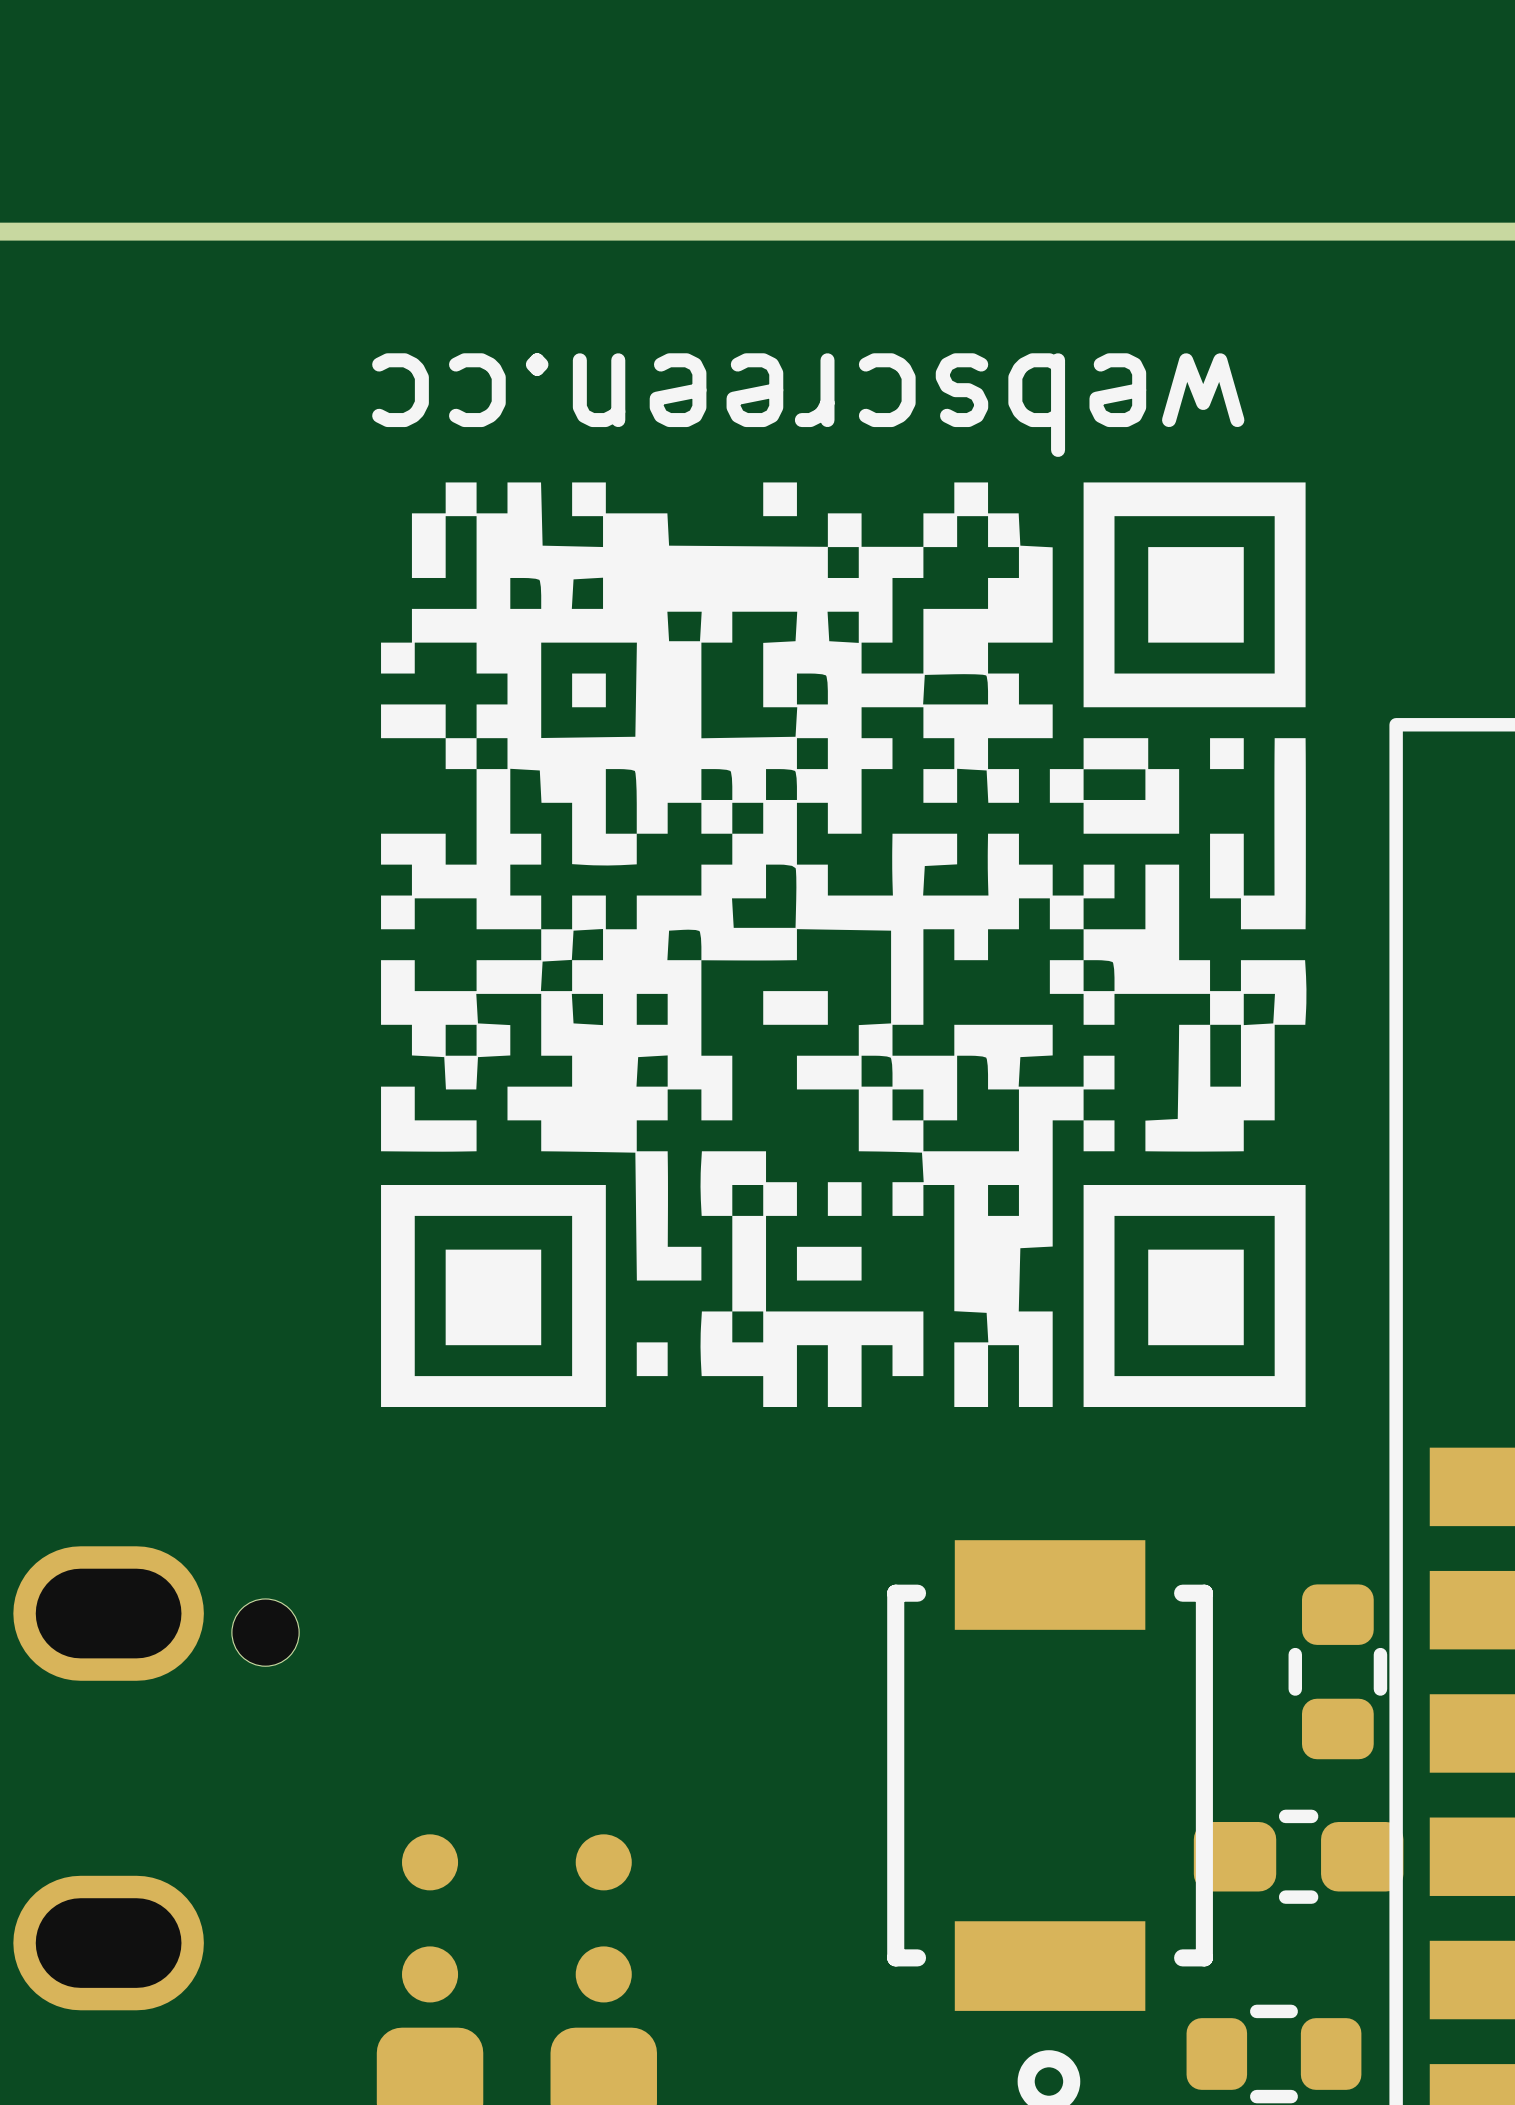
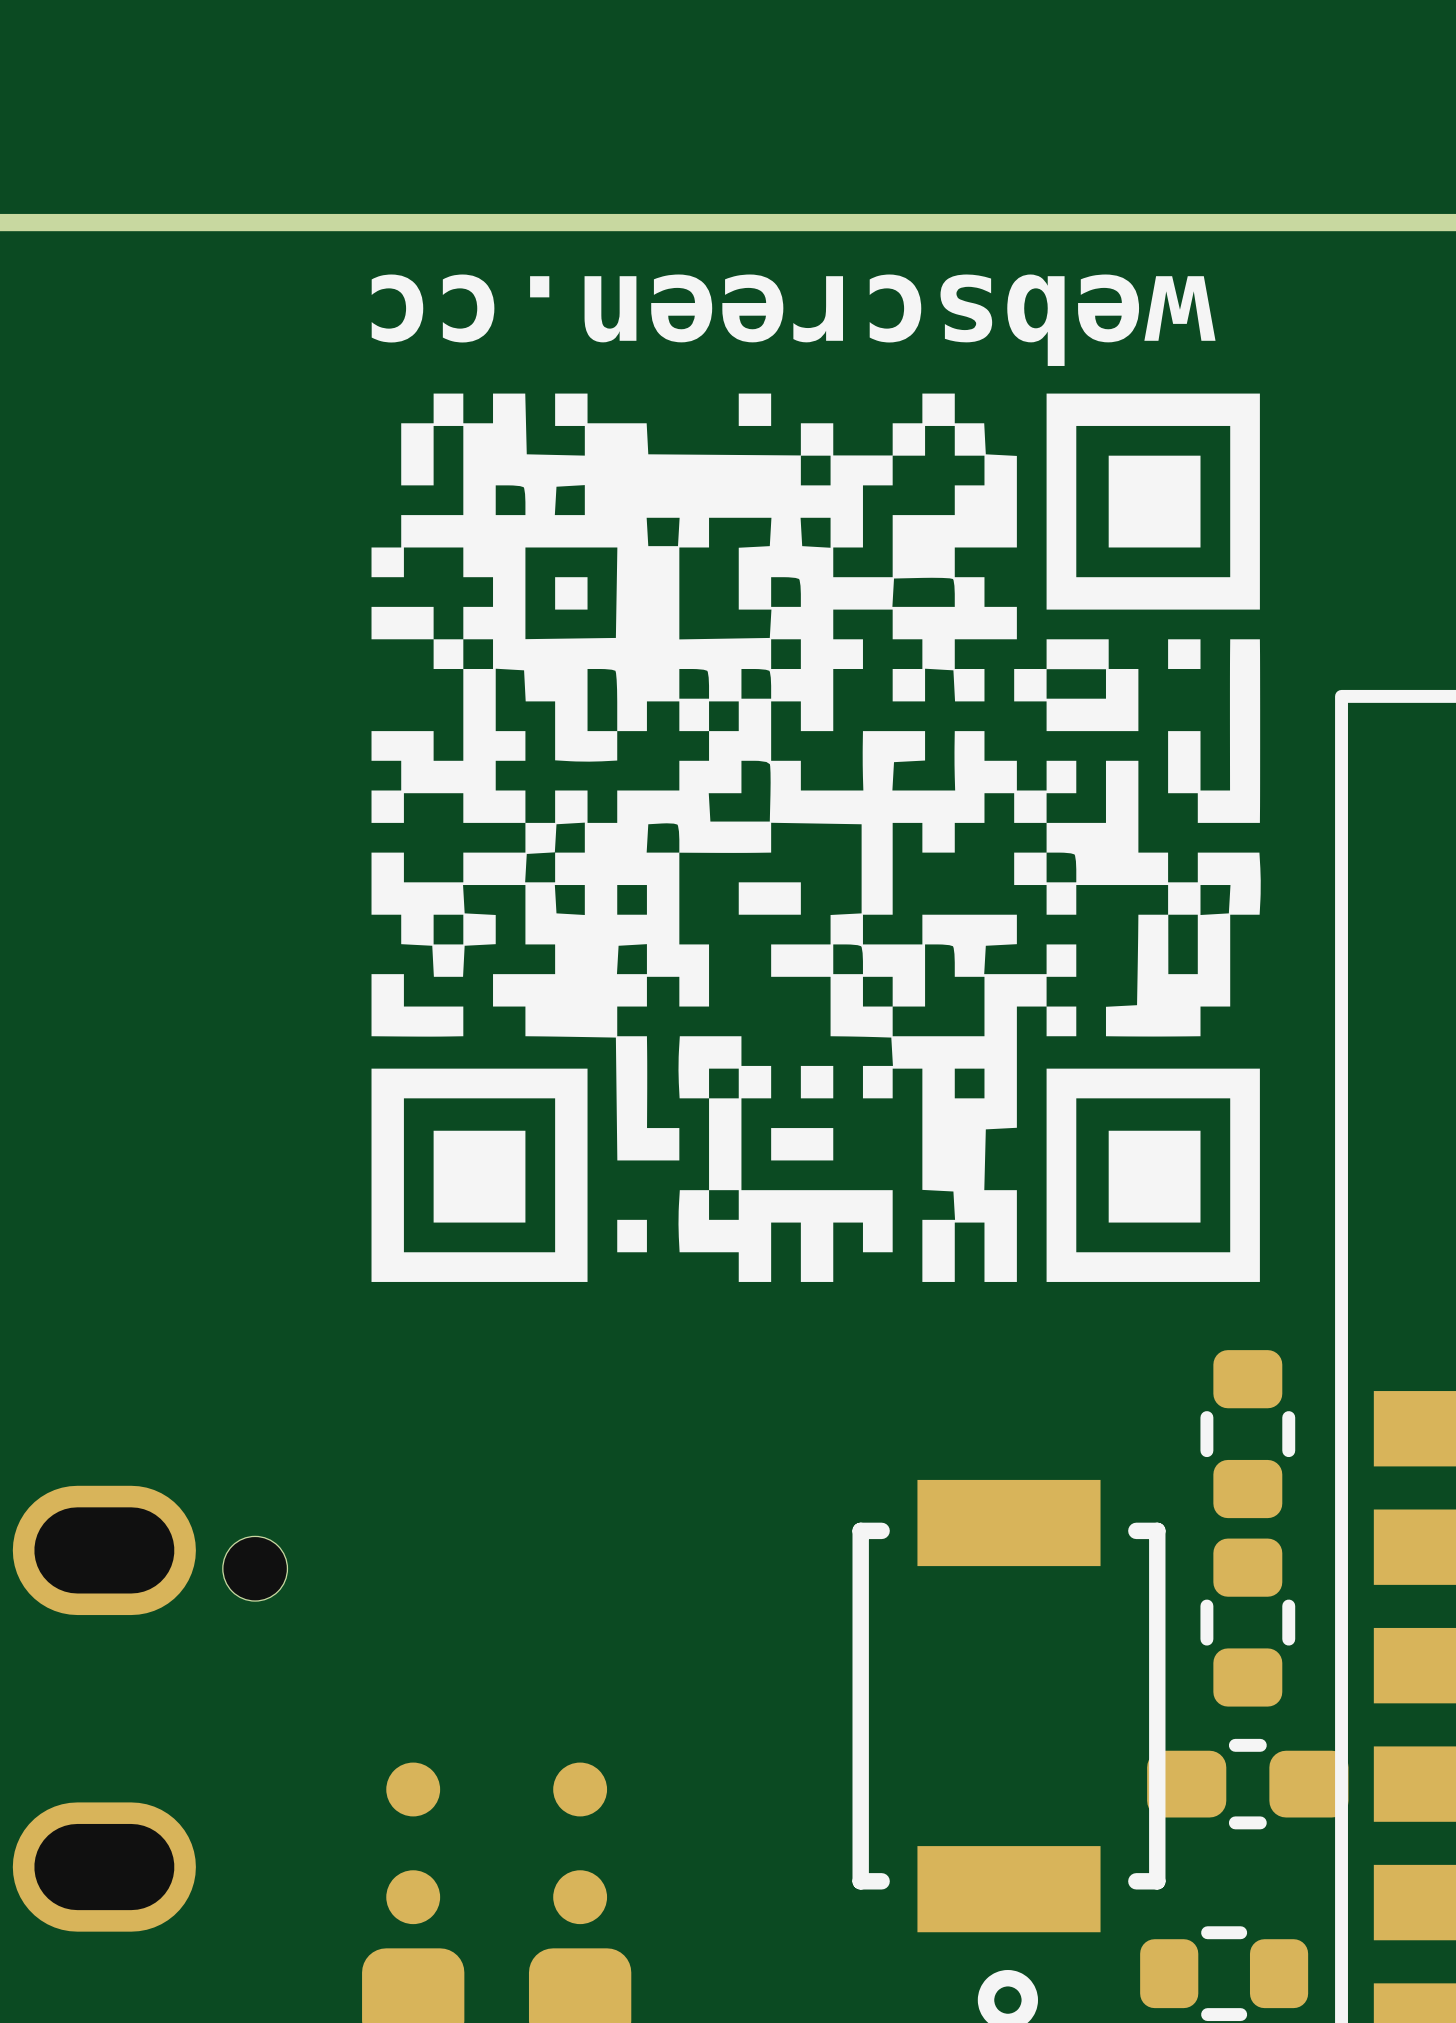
text position: webscreen.cc (808, 405) -> webscreen.cc (793, 320)
drawing position: (843, 944) -> (816, 837)
part: none -> (1247, 1434)
part position: (1337, 1671) -> (1247, 1622)

